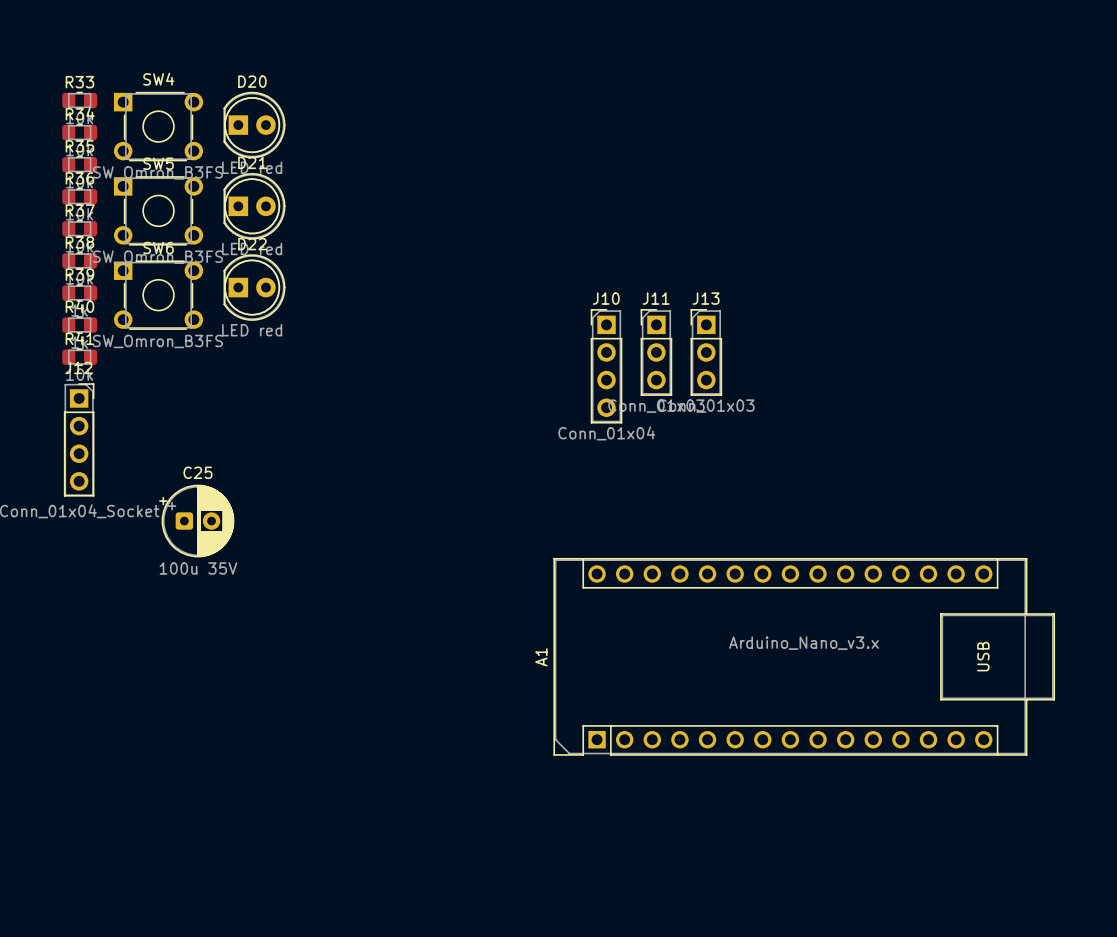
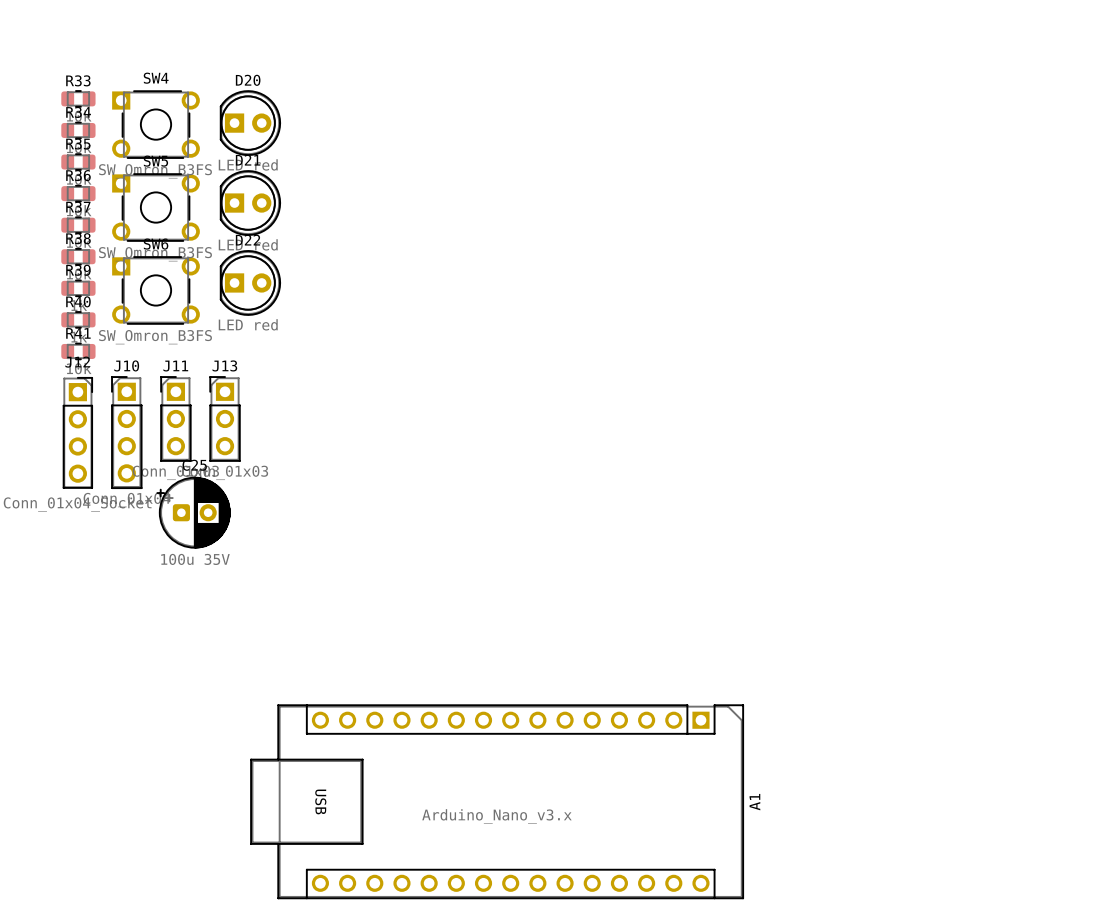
J11 position: (656, 352) -> (175, 418)
J13 position: (706, 352) -> (225, 418)
J10 position: (606, 366) -> (126, 432)
A1 rotation: 0° (804, 656) -> 180° (497, 801)
A1 position: (804, 656) -> (497, 801)

